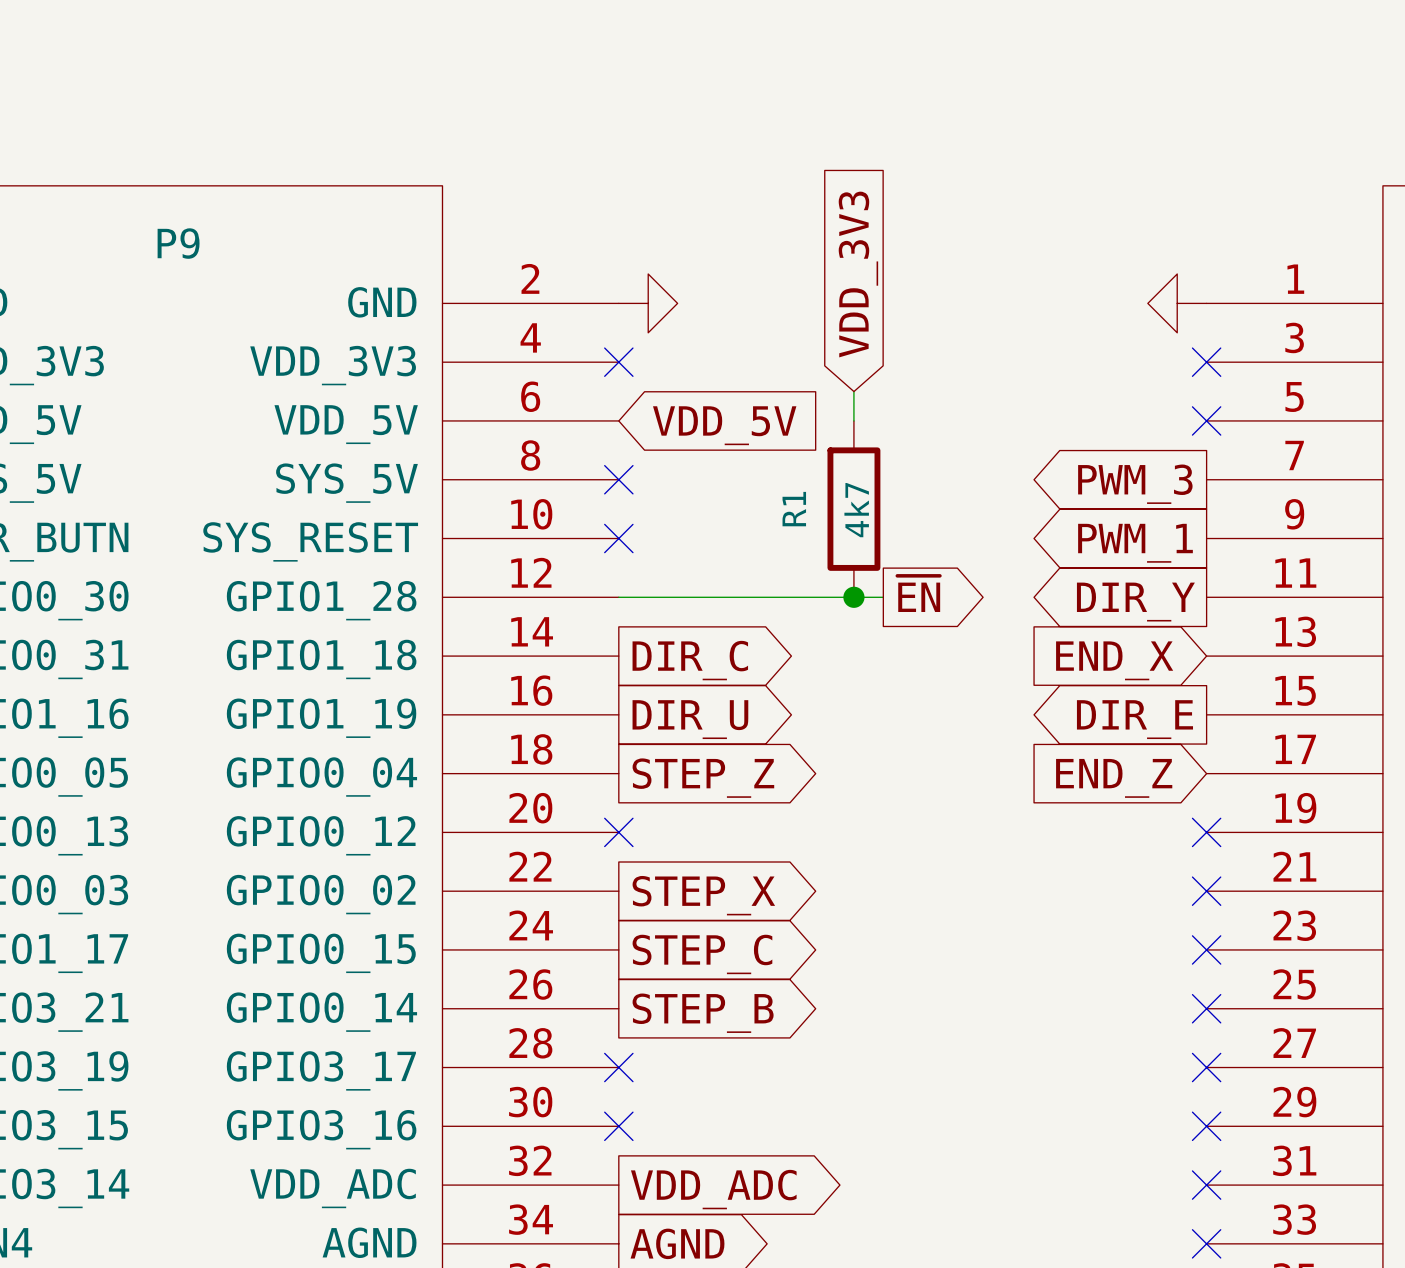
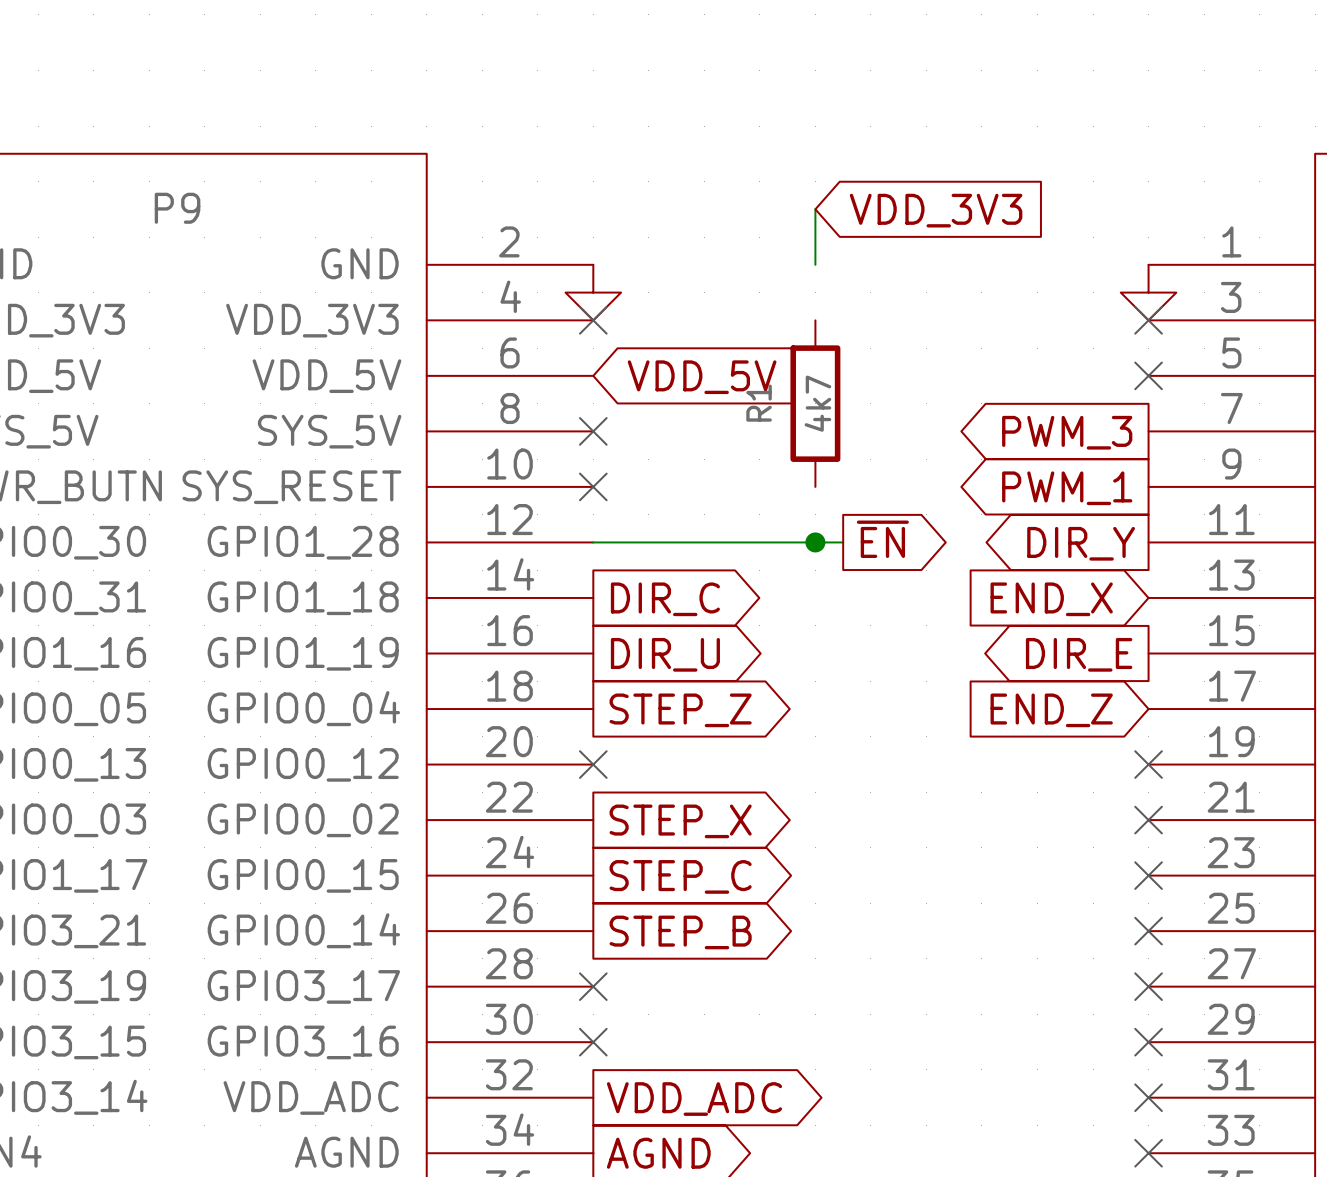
wire: none -> (815, 209) (815, 264)
global label rotation: 0° (858, 274) -> 90° clockwise (936, 210)
power symbol rotation: 0° (648, 303) -> 90° clockwise (593, 292)
power symbol position: (648, 303) -> (593, 292)
power symbol rotation: 0° (1177, 303) -> 90° counterclockwise (1148, 292)
power symbol position: (1177, 303) -> (1148, 292)
wire: (853, 391) (853, 420) -> none
R1 position: (853, 509) -> (815, 403)

